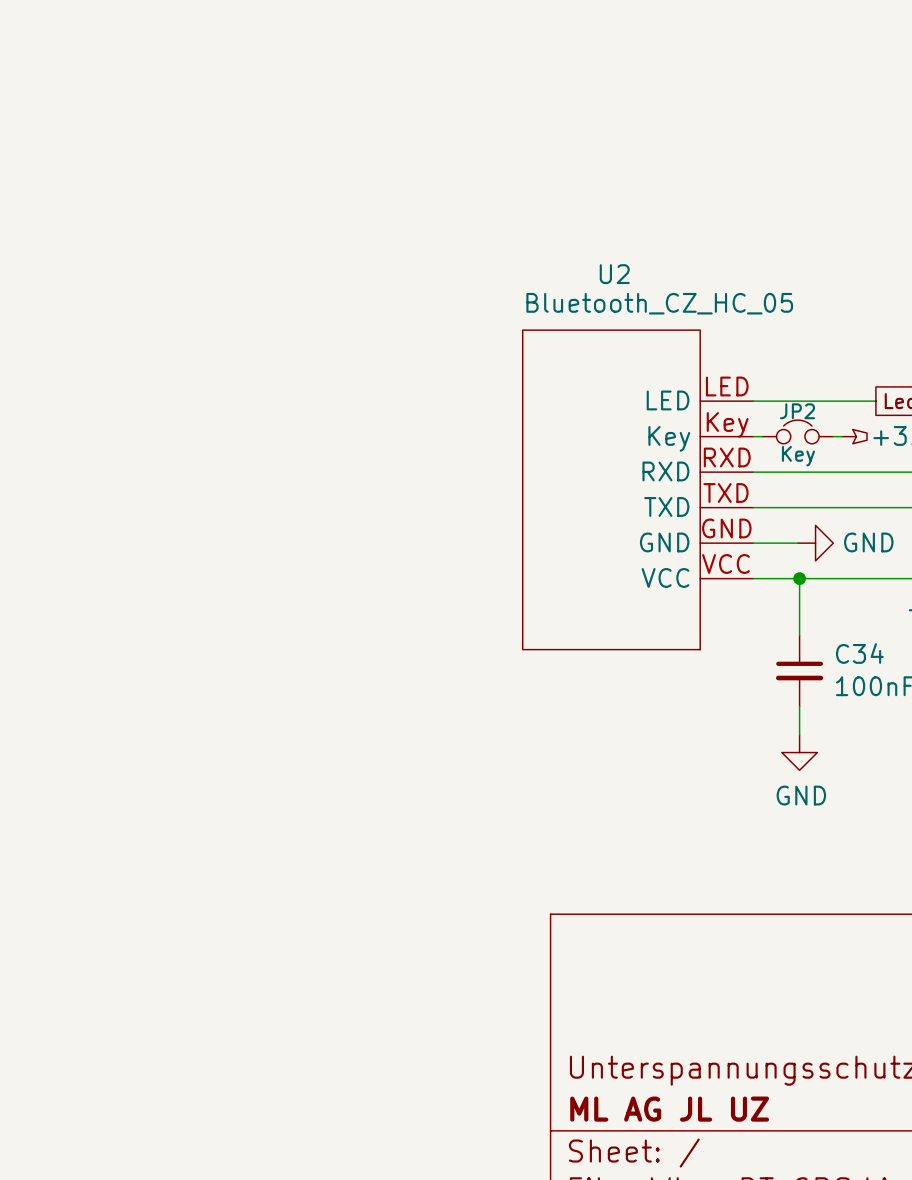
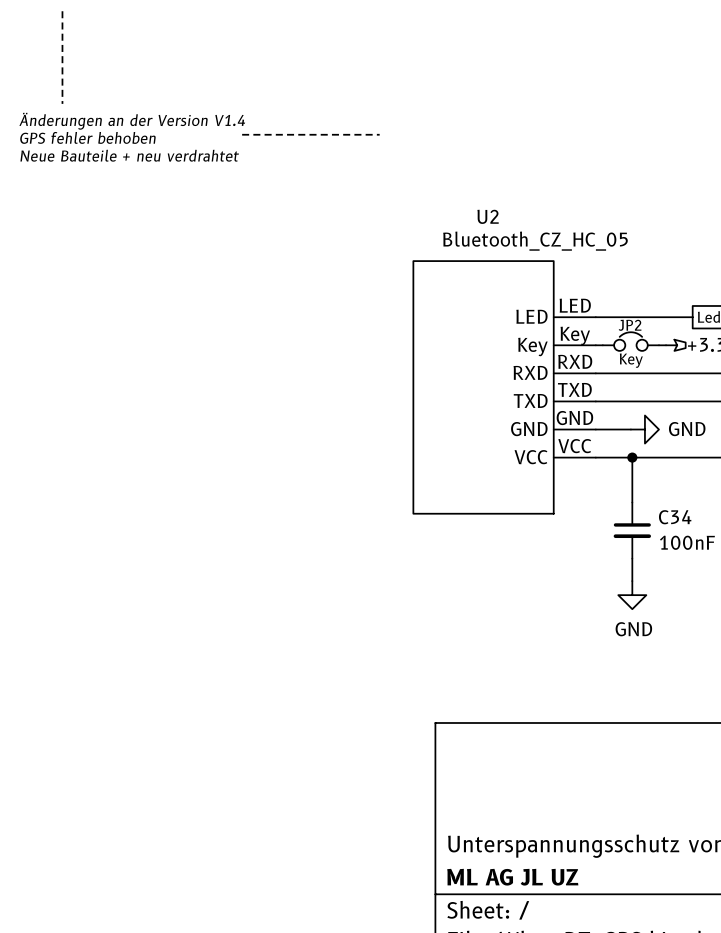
line: none -> (62, 11) (62, 103)
text: none -> Änderungen an der Version V1.4 (132, 121)
line: none -> (242, 134) (379, 134)
text: none -> GPS fehler behoben (87, 137)
text: none -> Neue Bauteile + neu verdrahtet (129, 155)

